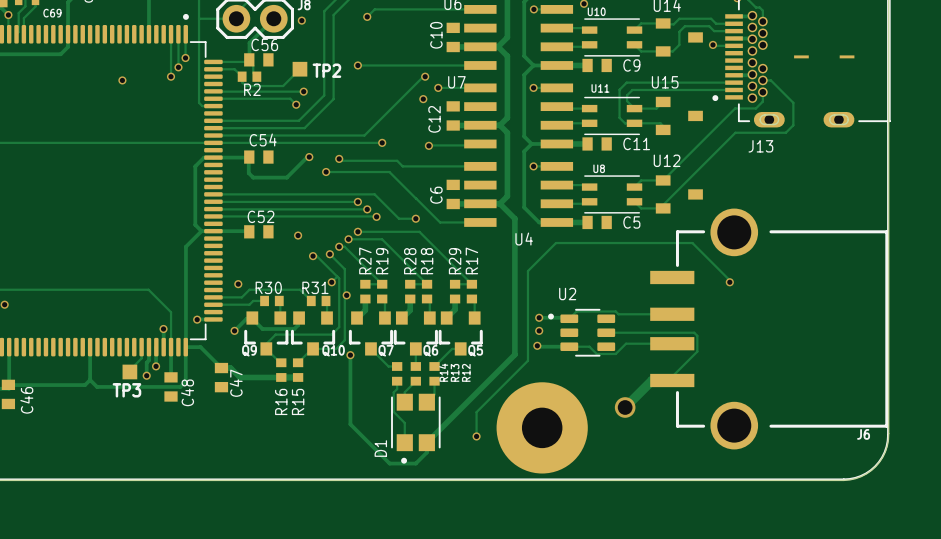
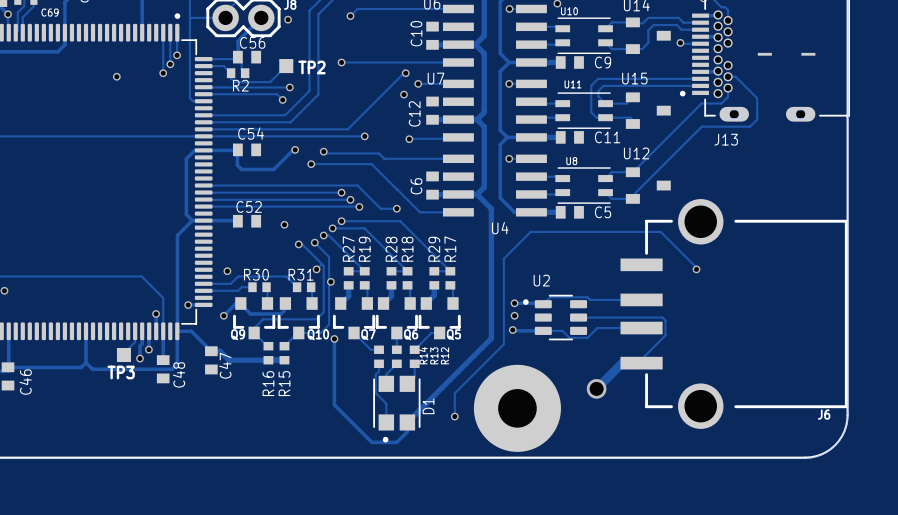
D1 name position: D1 (380, 448) -> D1 (428, 406)

